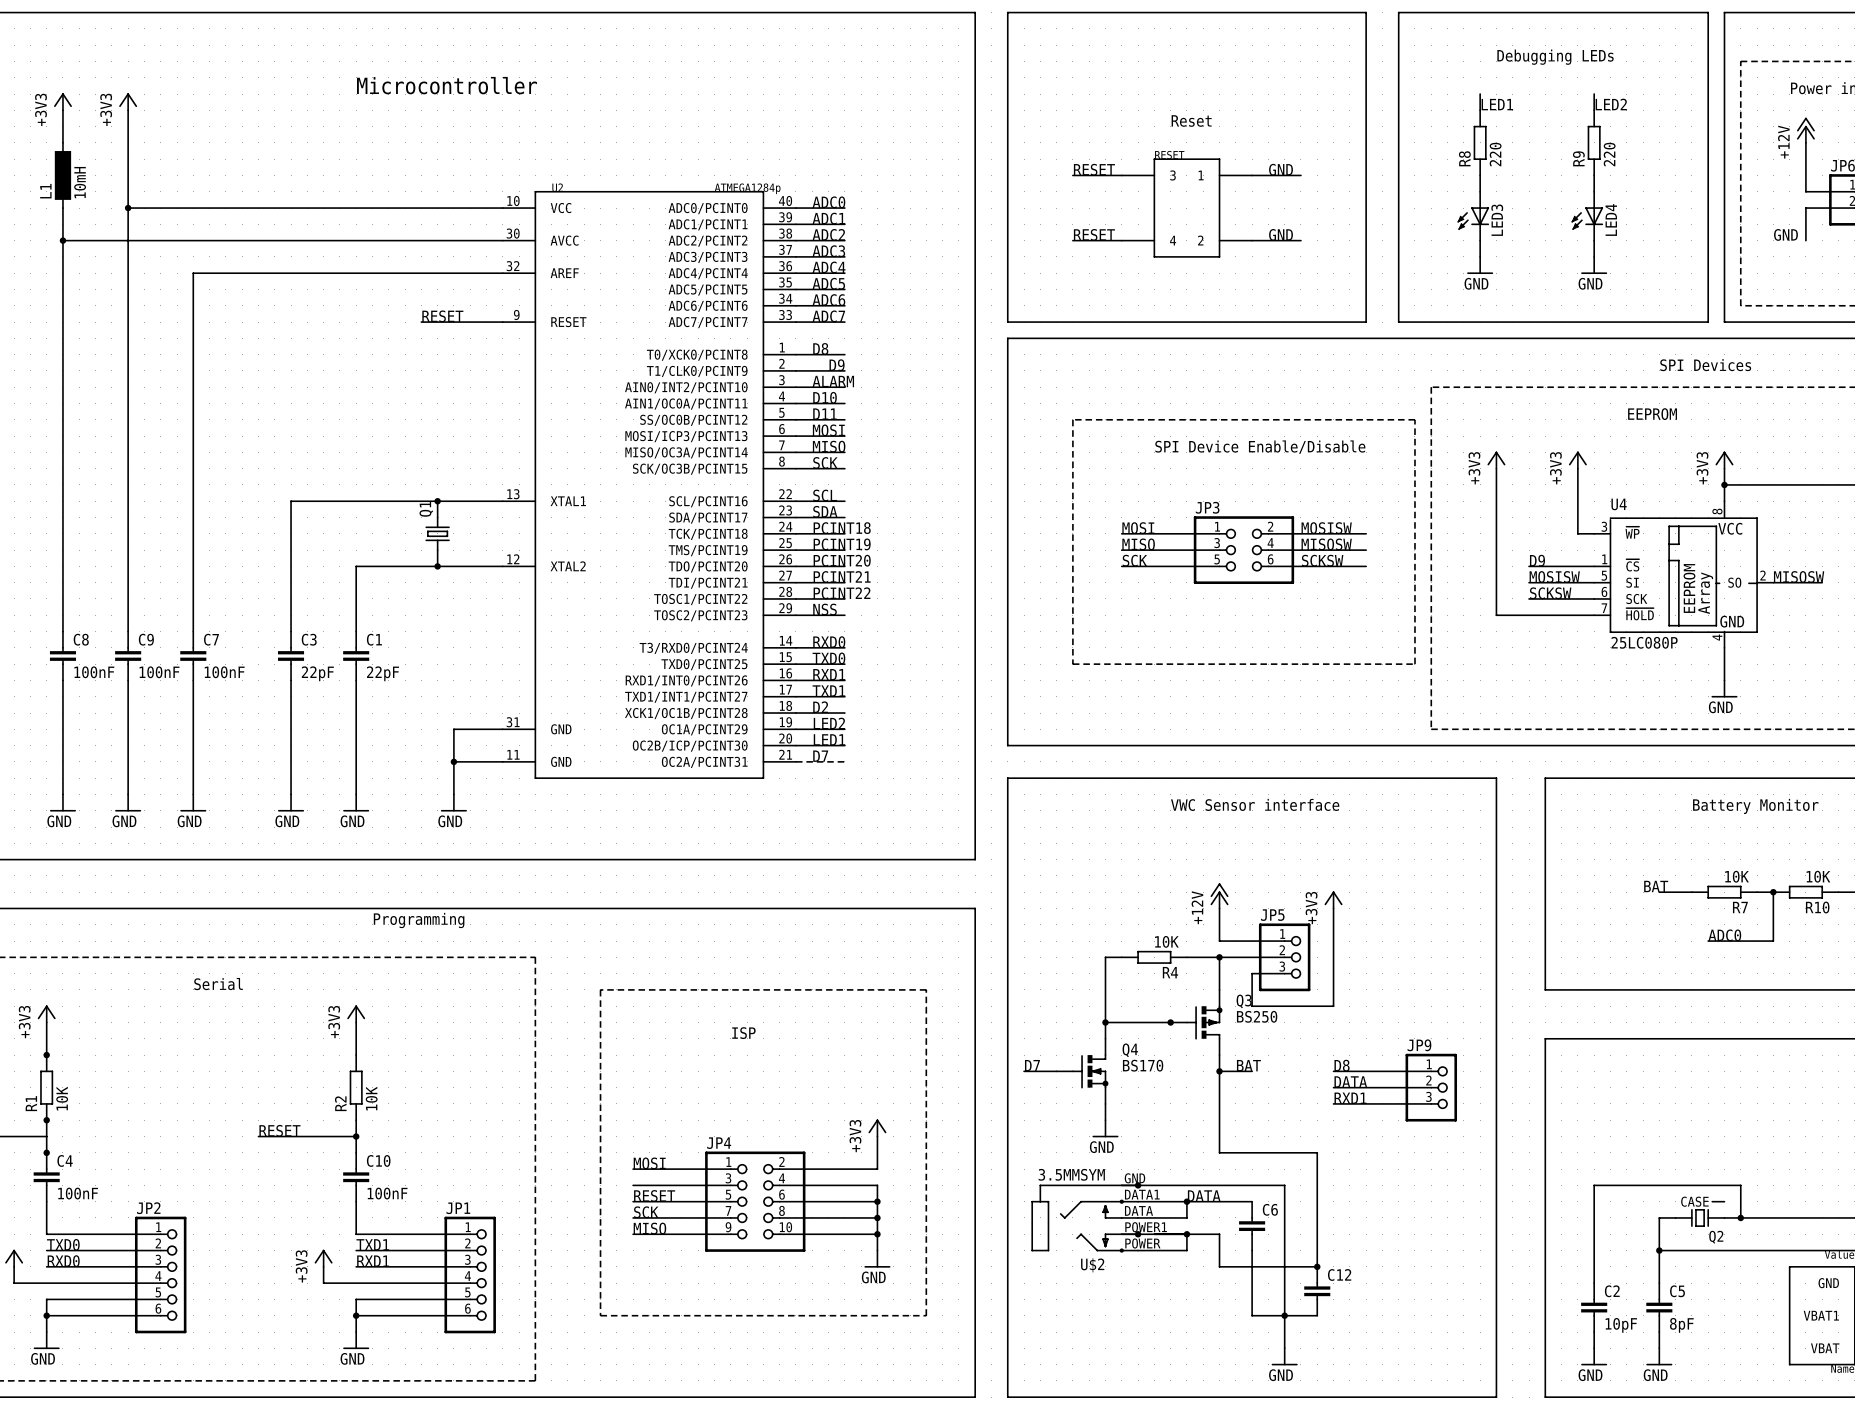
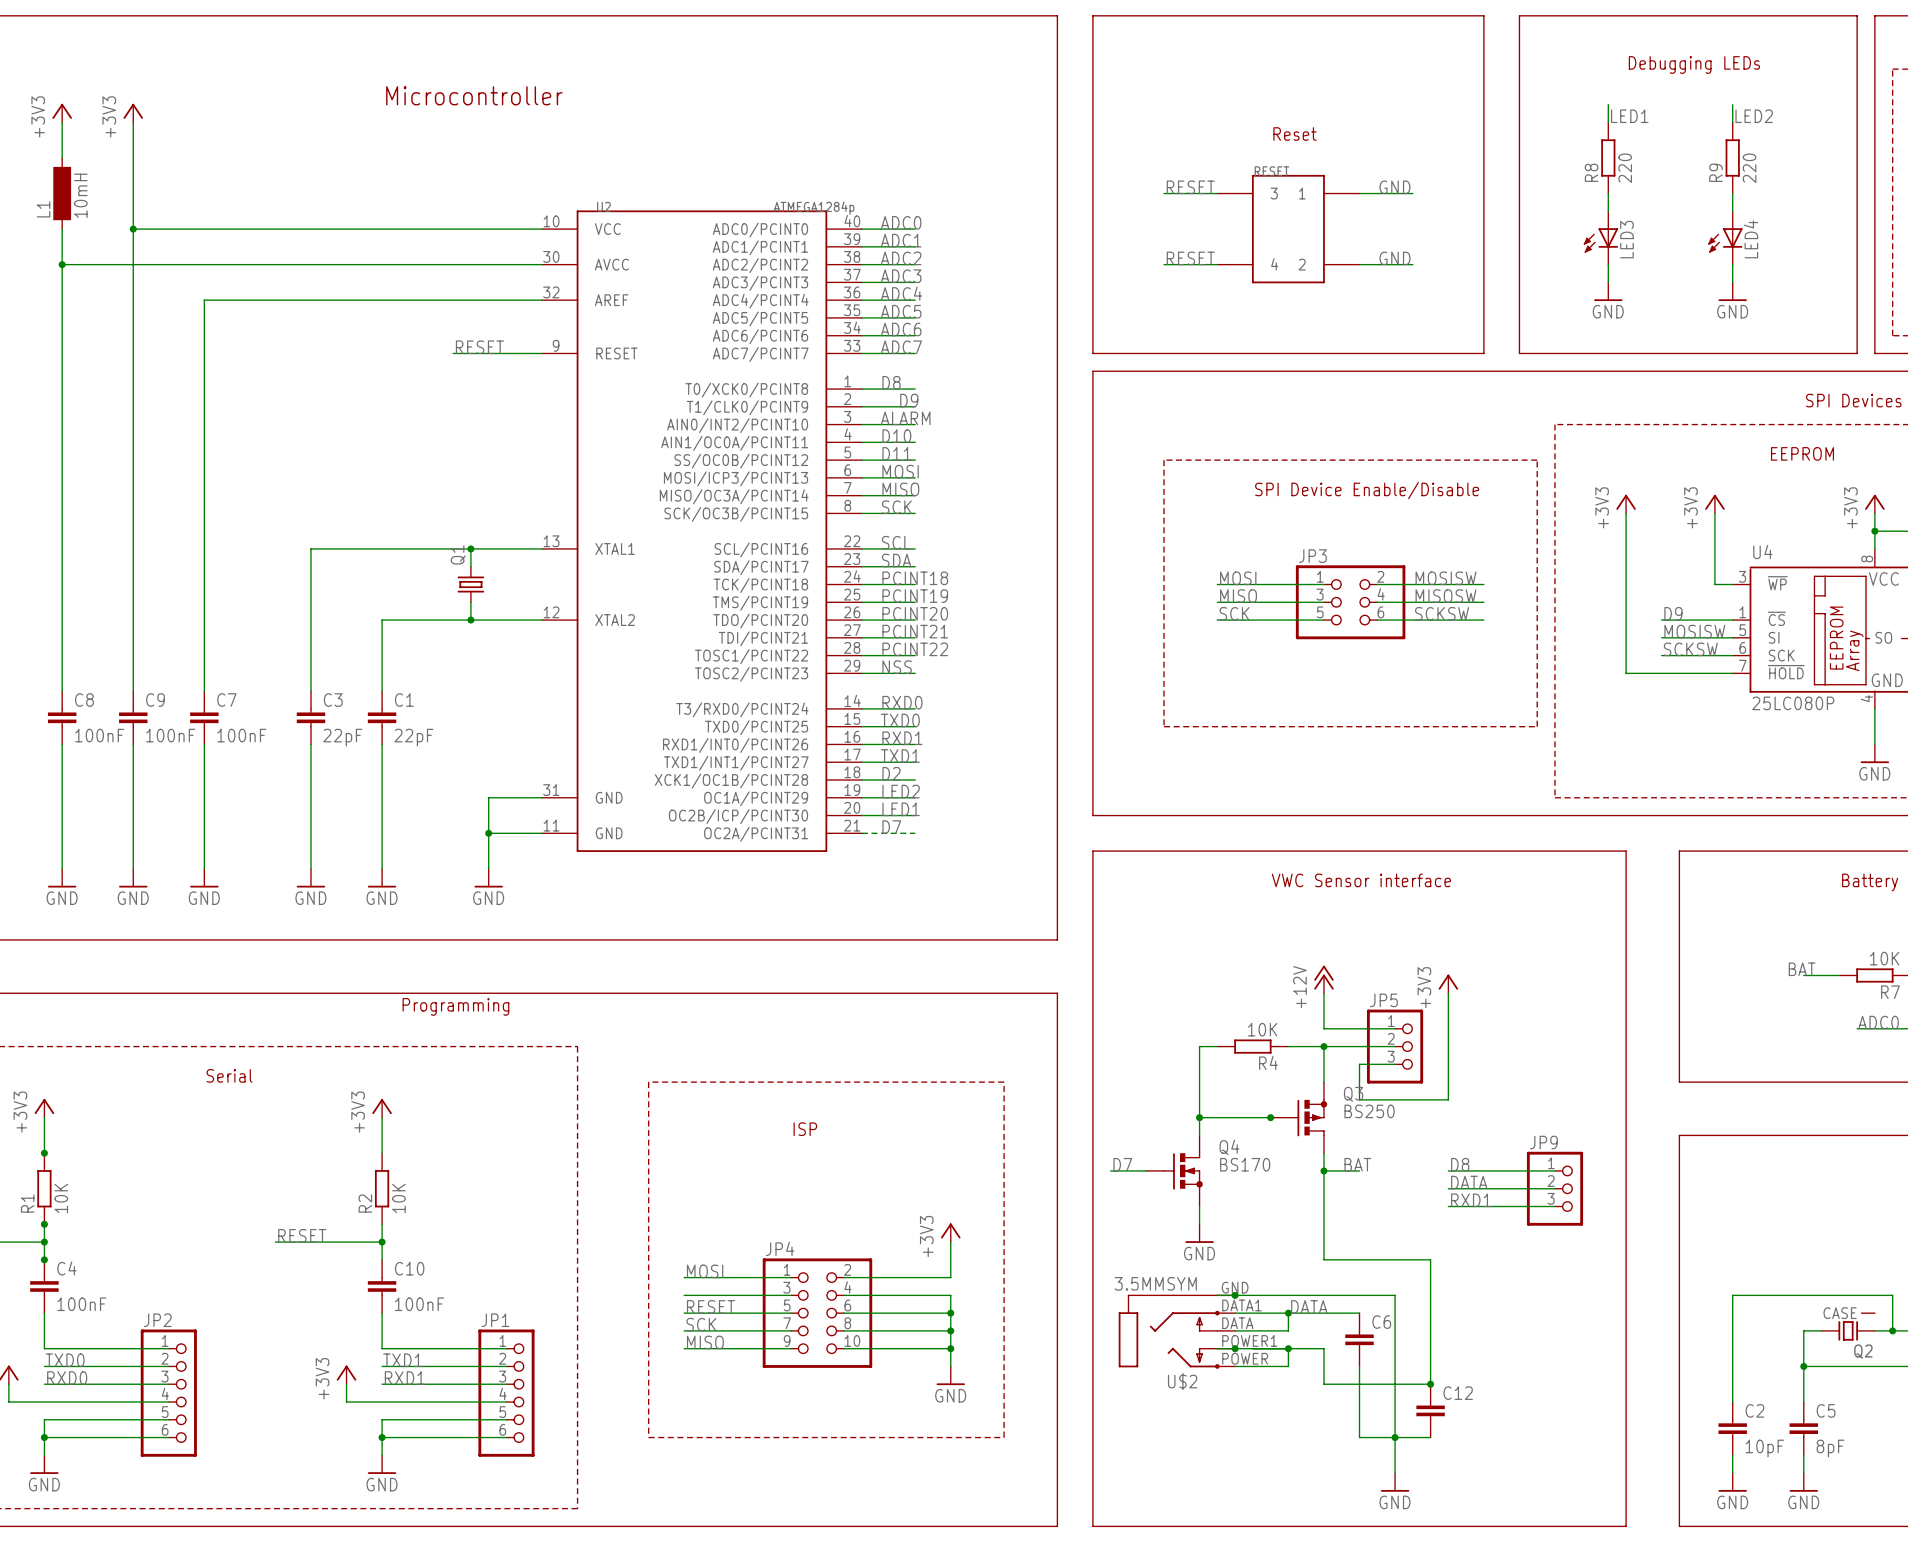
junction: none -> (44, 1242)

